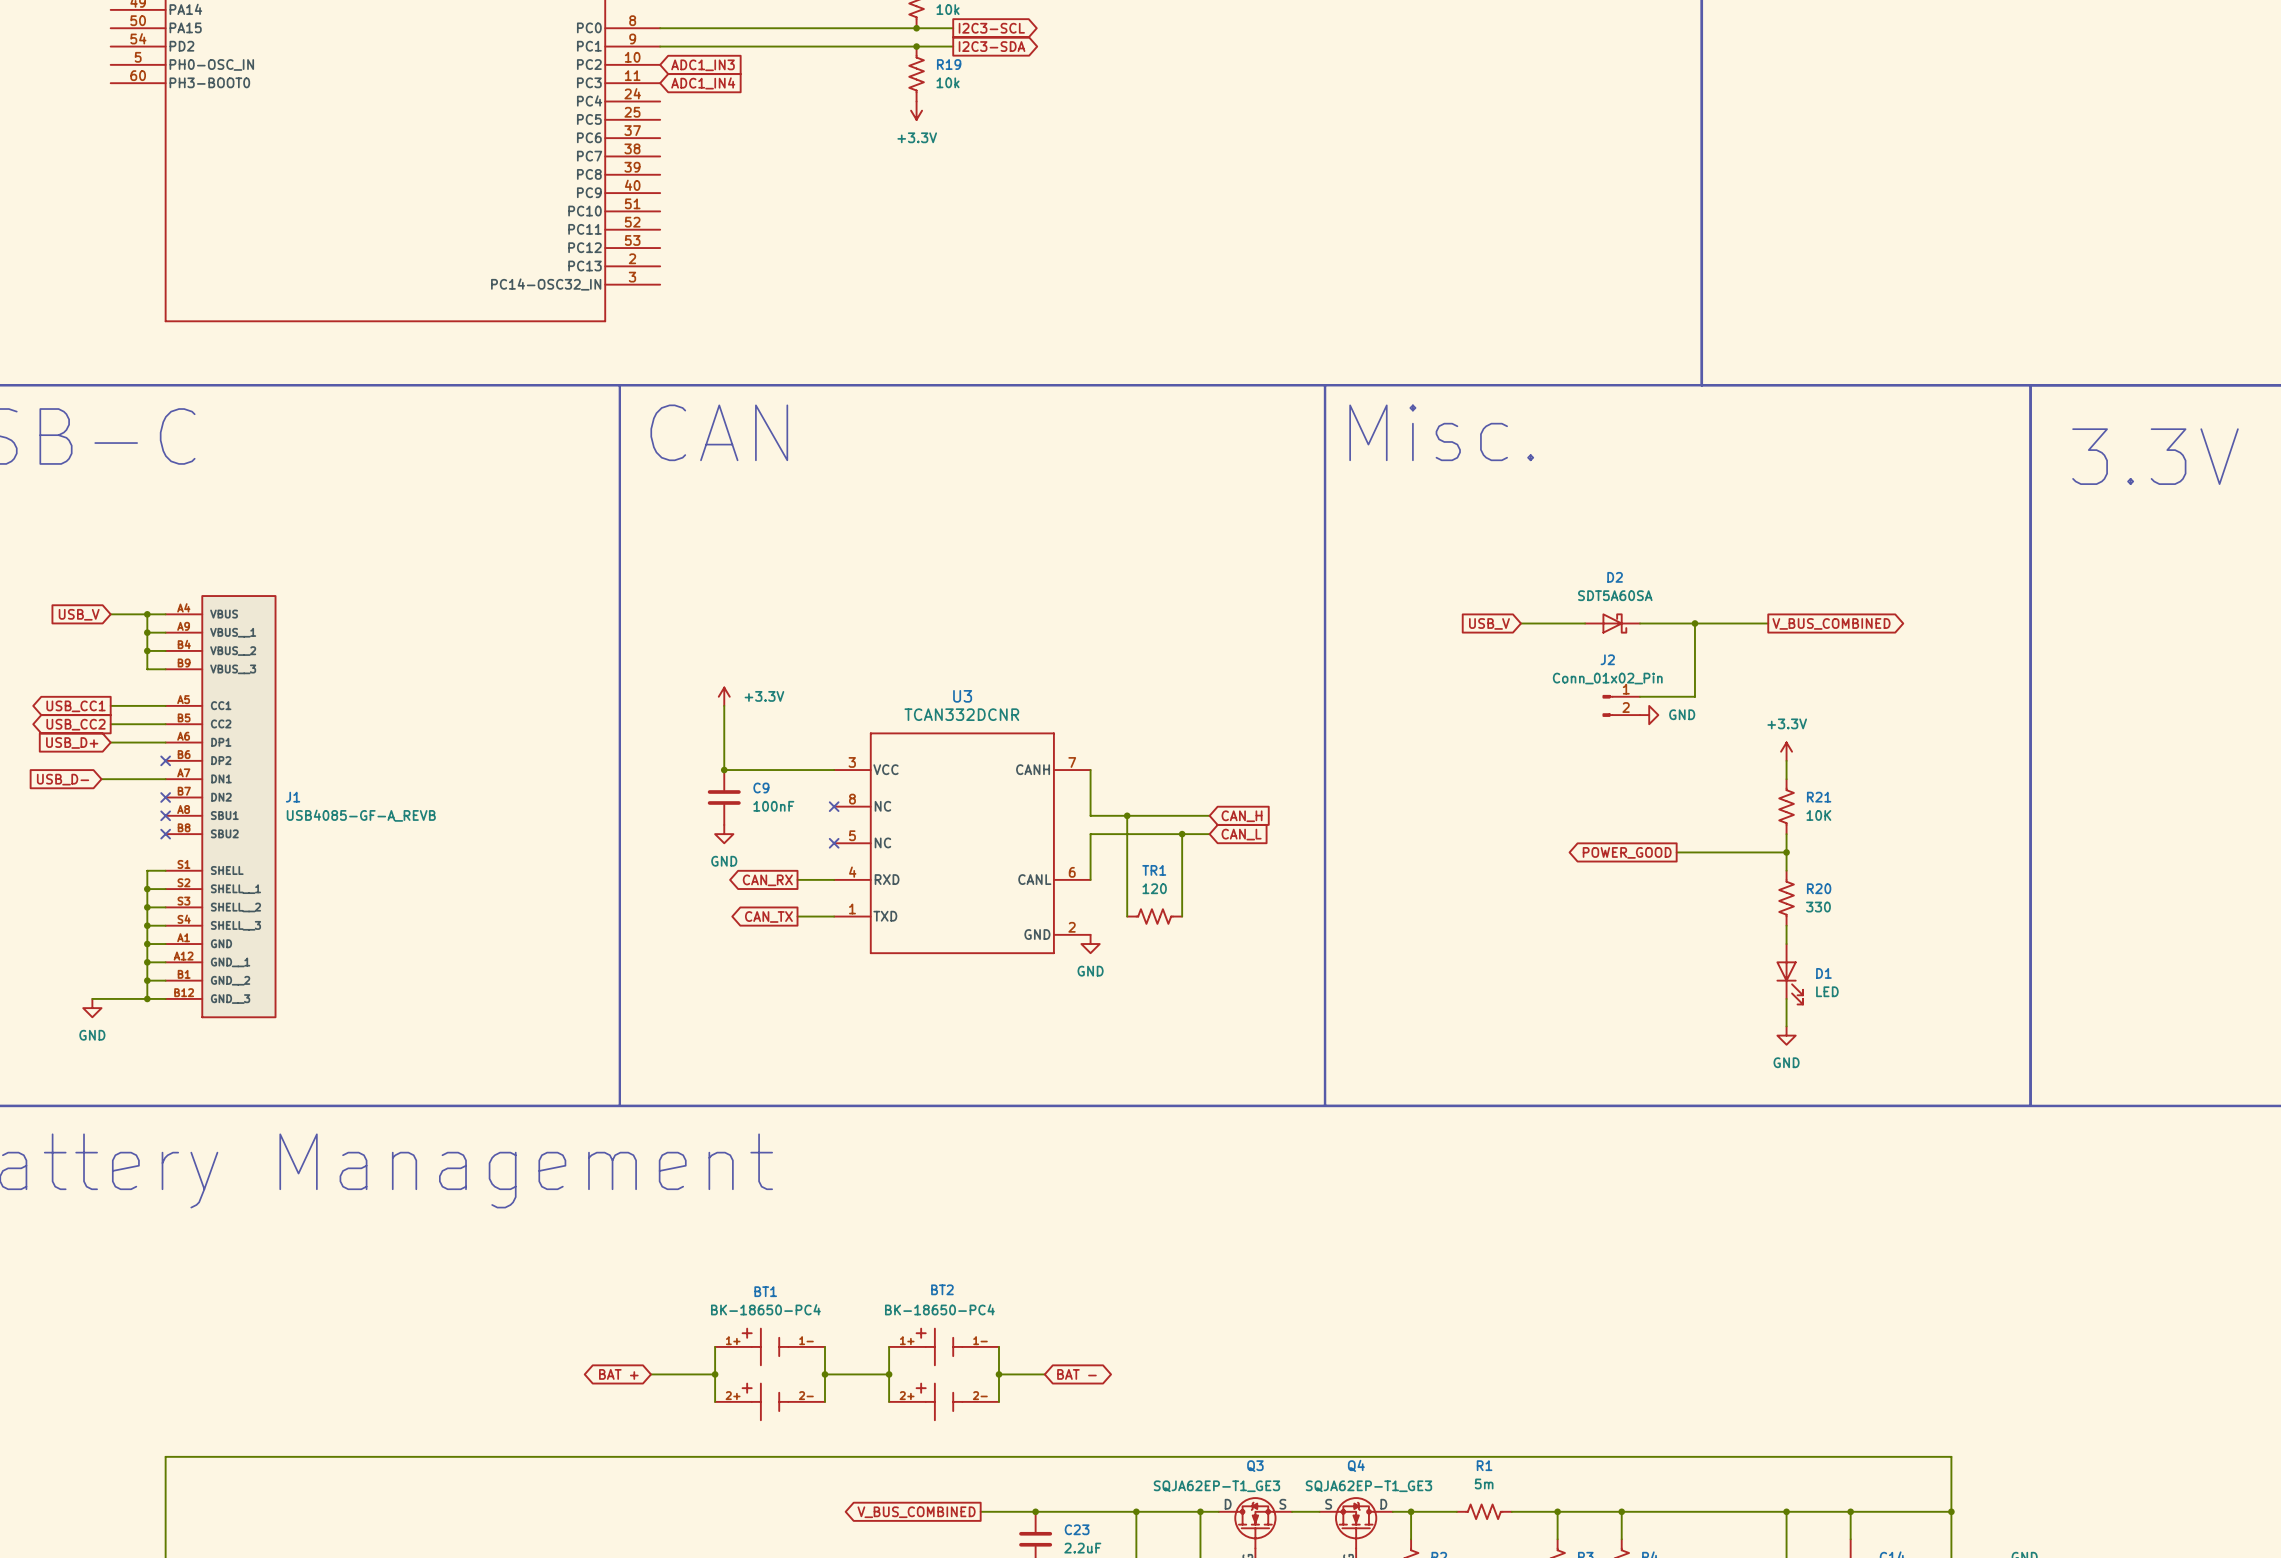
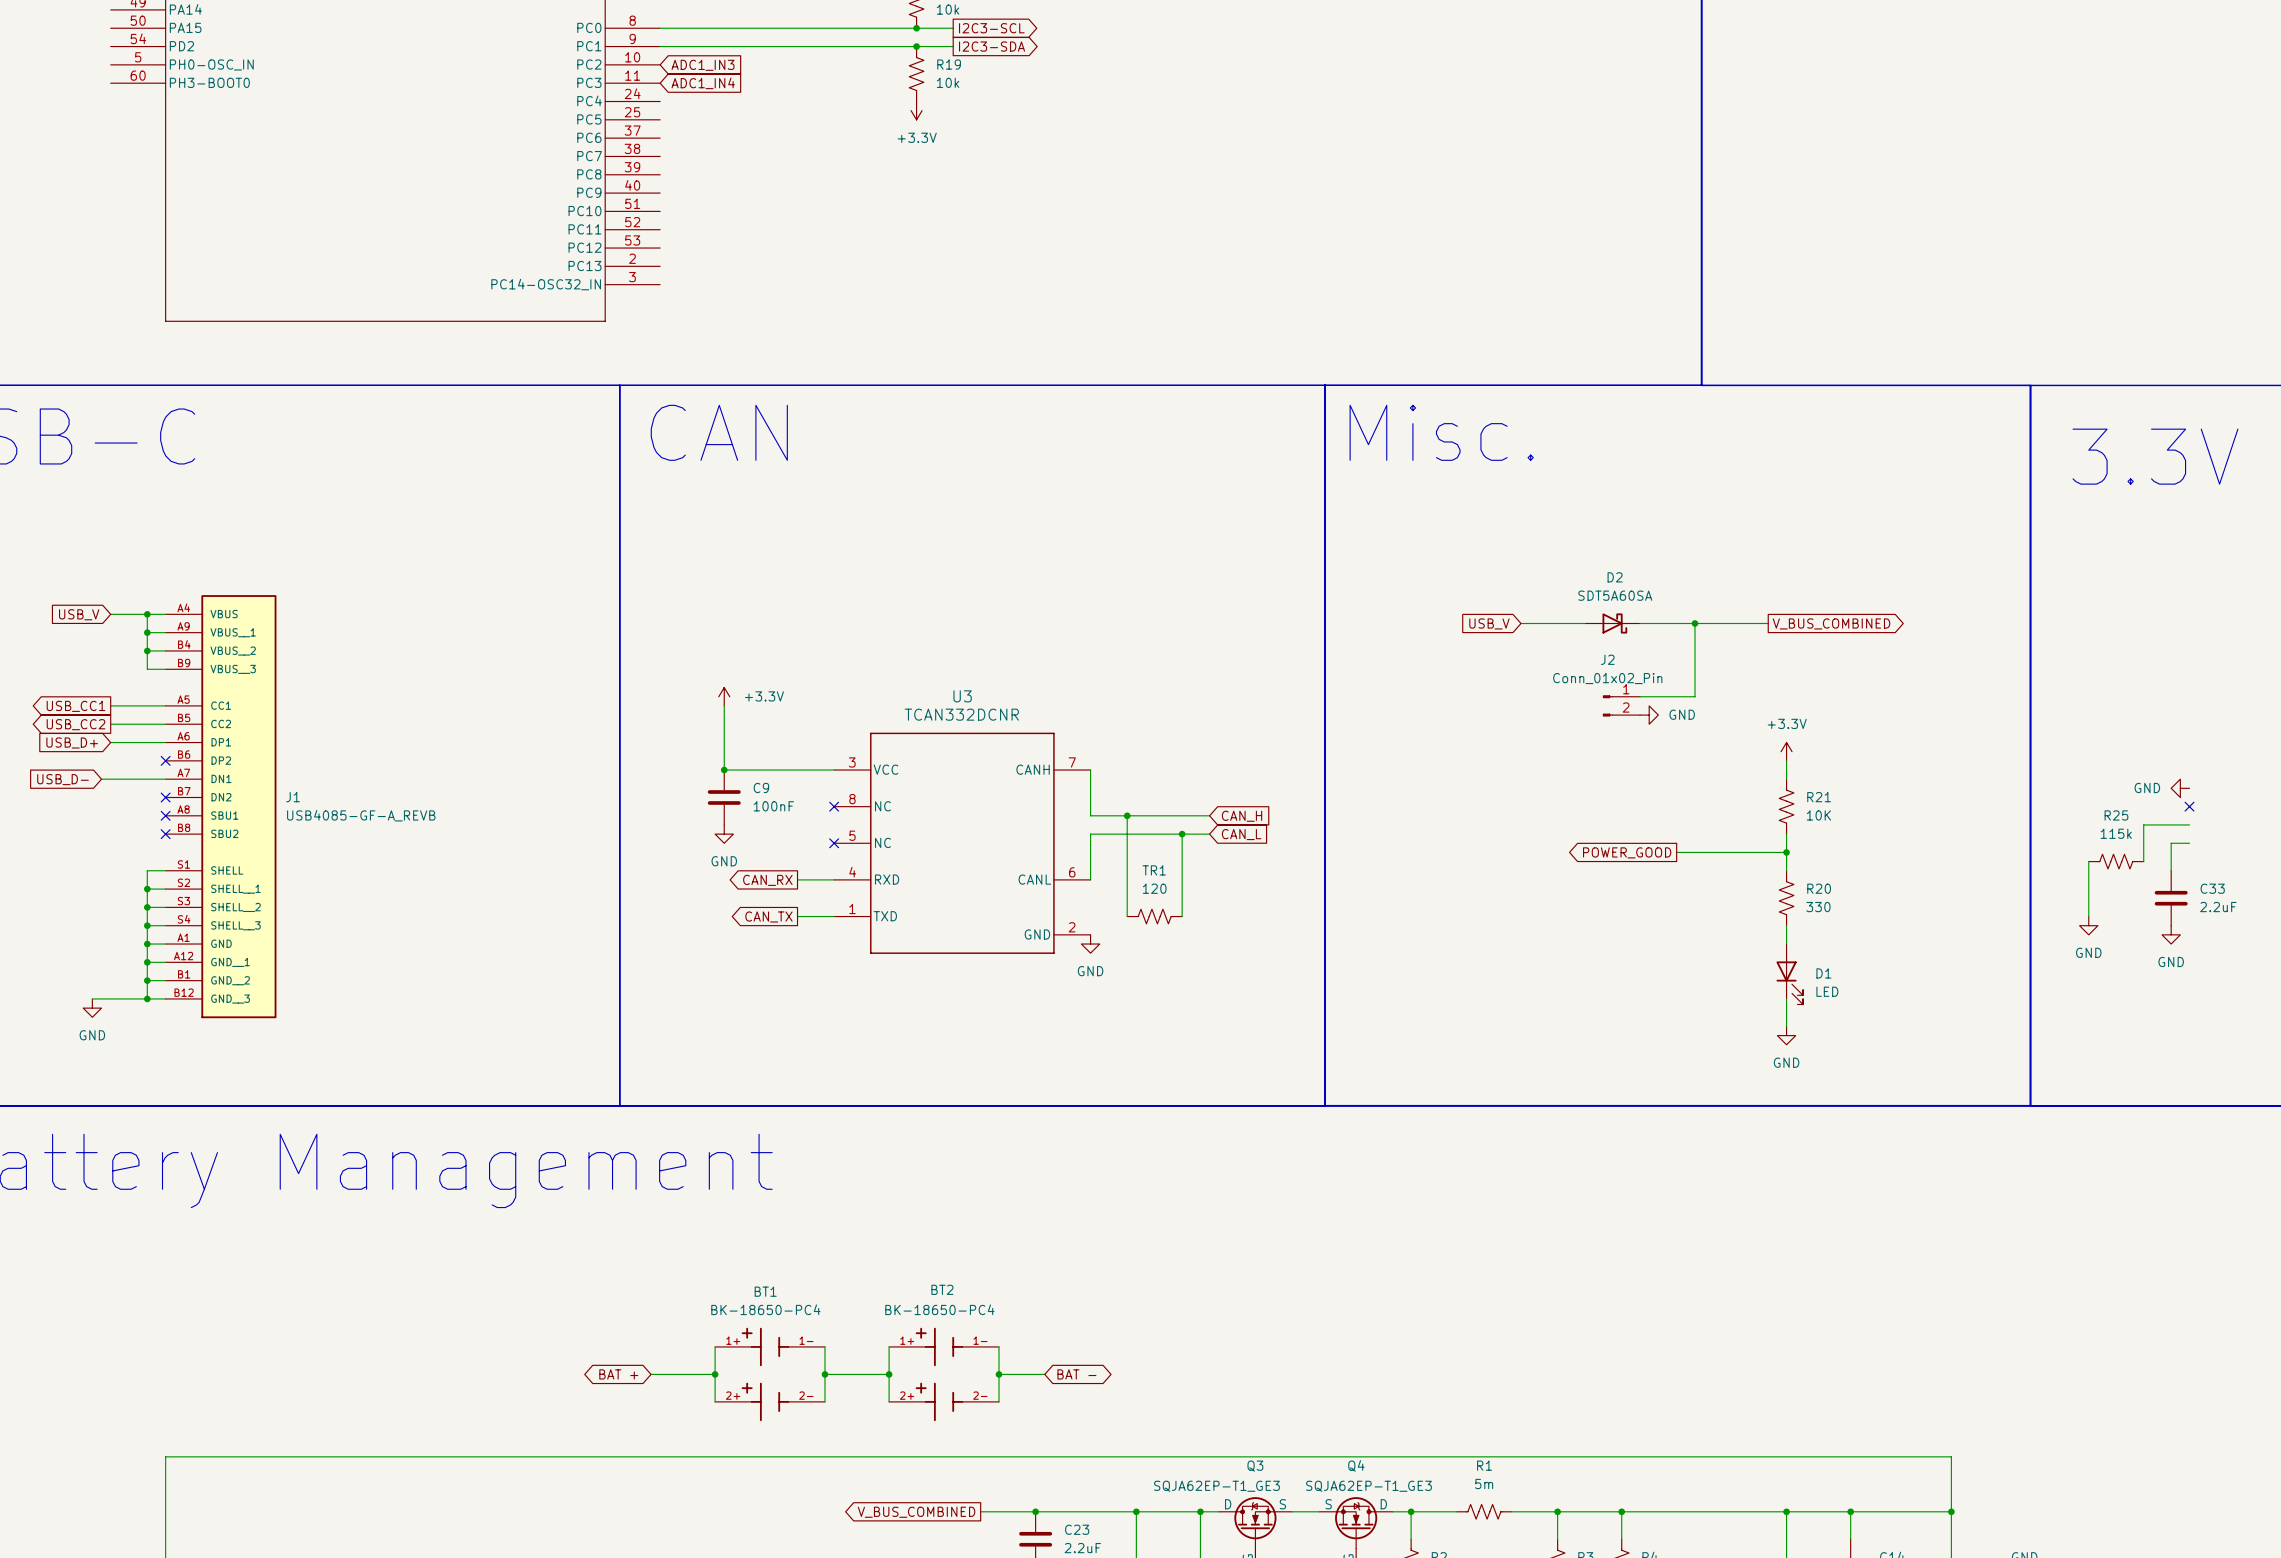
power symbol: none -> GND (2180, 788)
no-connect mark: none -> (2189, 806)
wire: none -> (2189, 824) (2143, 824) (2143, 861)
wire: none -> (2189, 843) (2171, 843) (2171, 870)
wire: none -> (2088, 861) (2088, 916)
R25: none -> 115k (2116, 861)
C33: none -> 2.2uF (2171, 898)
power symbol: none -> GND (2088, 925)
power symbol: none -> GND (2171, 934)

